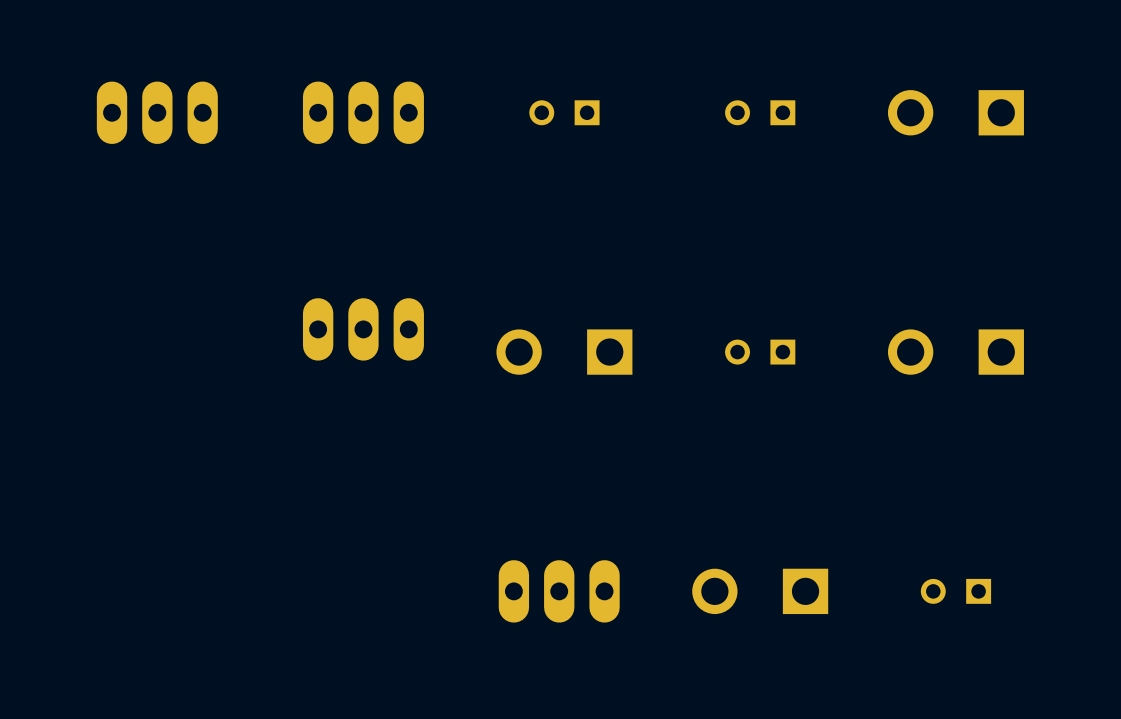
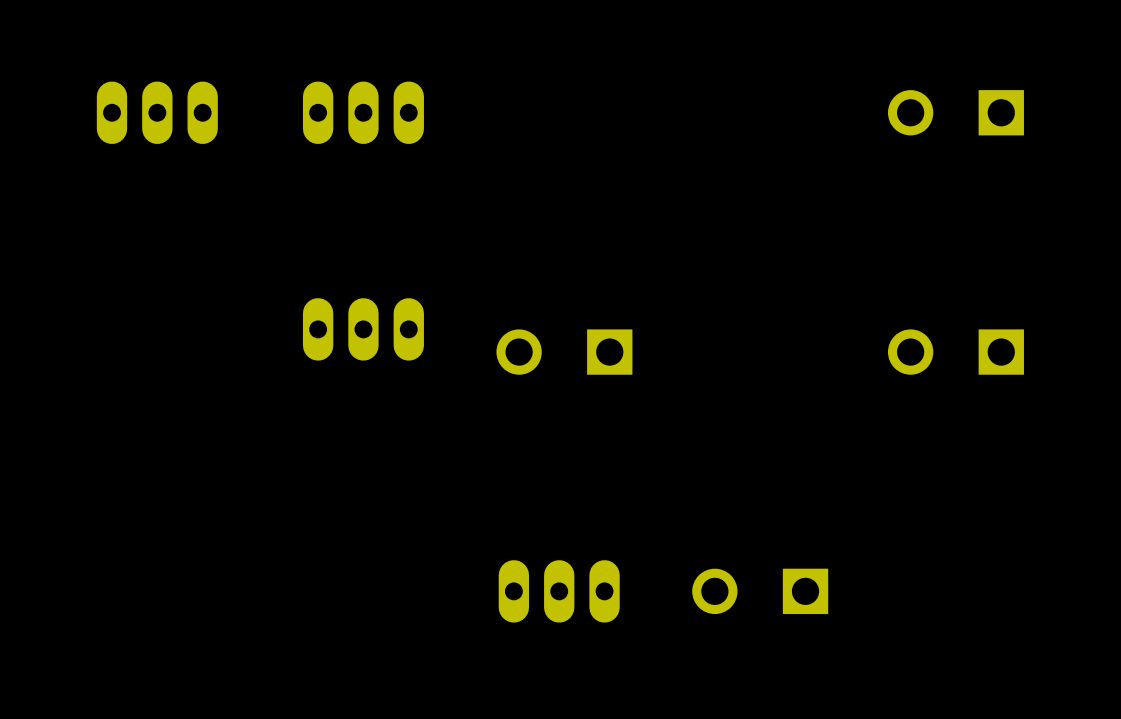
part: (564, 112) -> none
part: (760, 112) -> none
part: (760, 352) -> none
part: (955, 591) -> none

